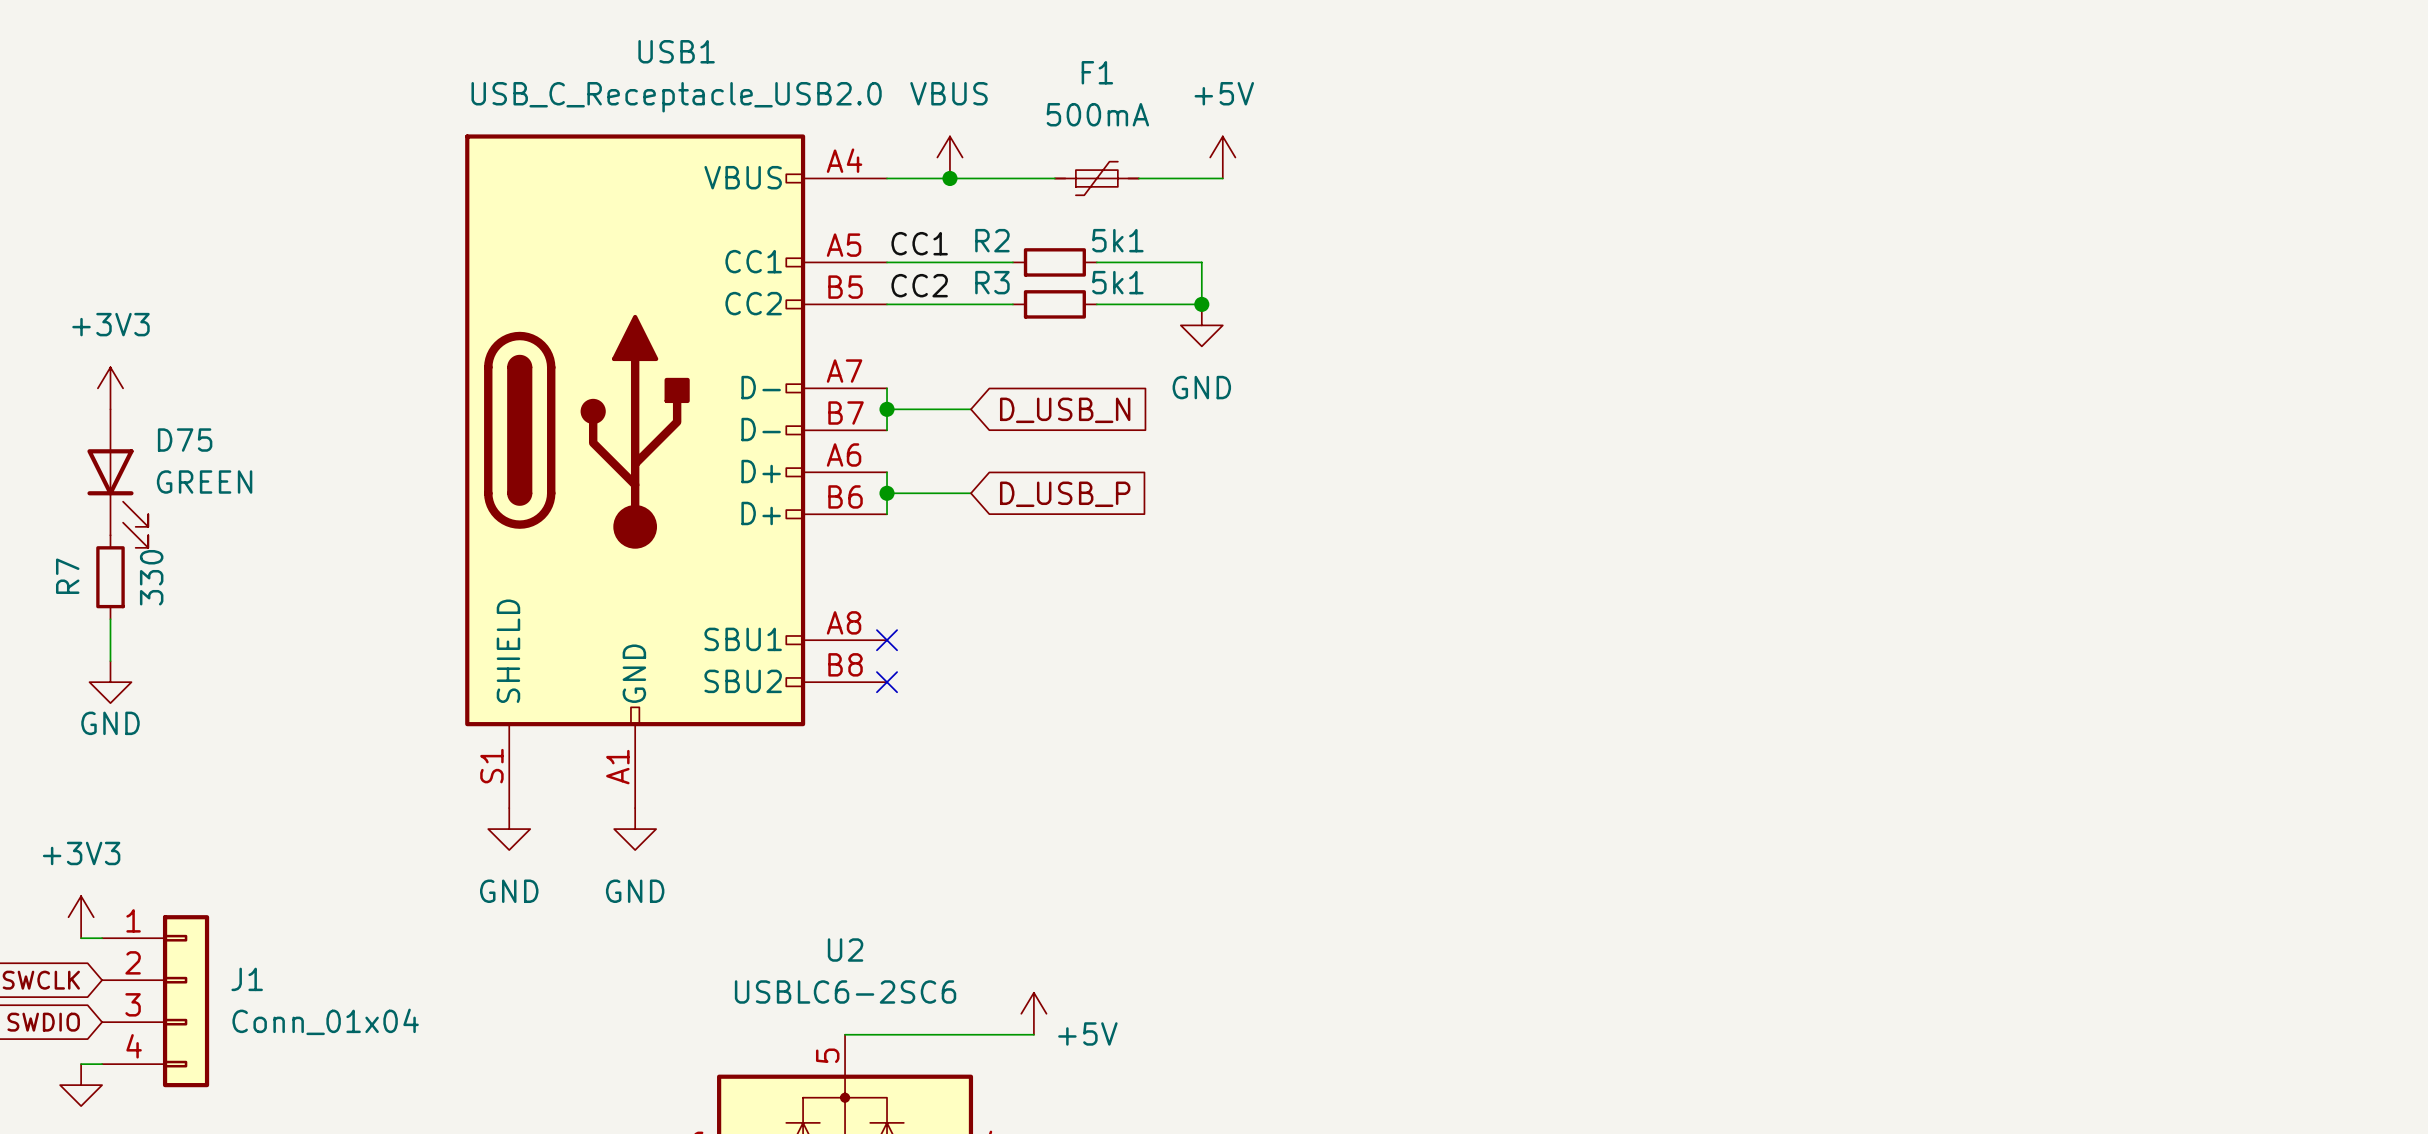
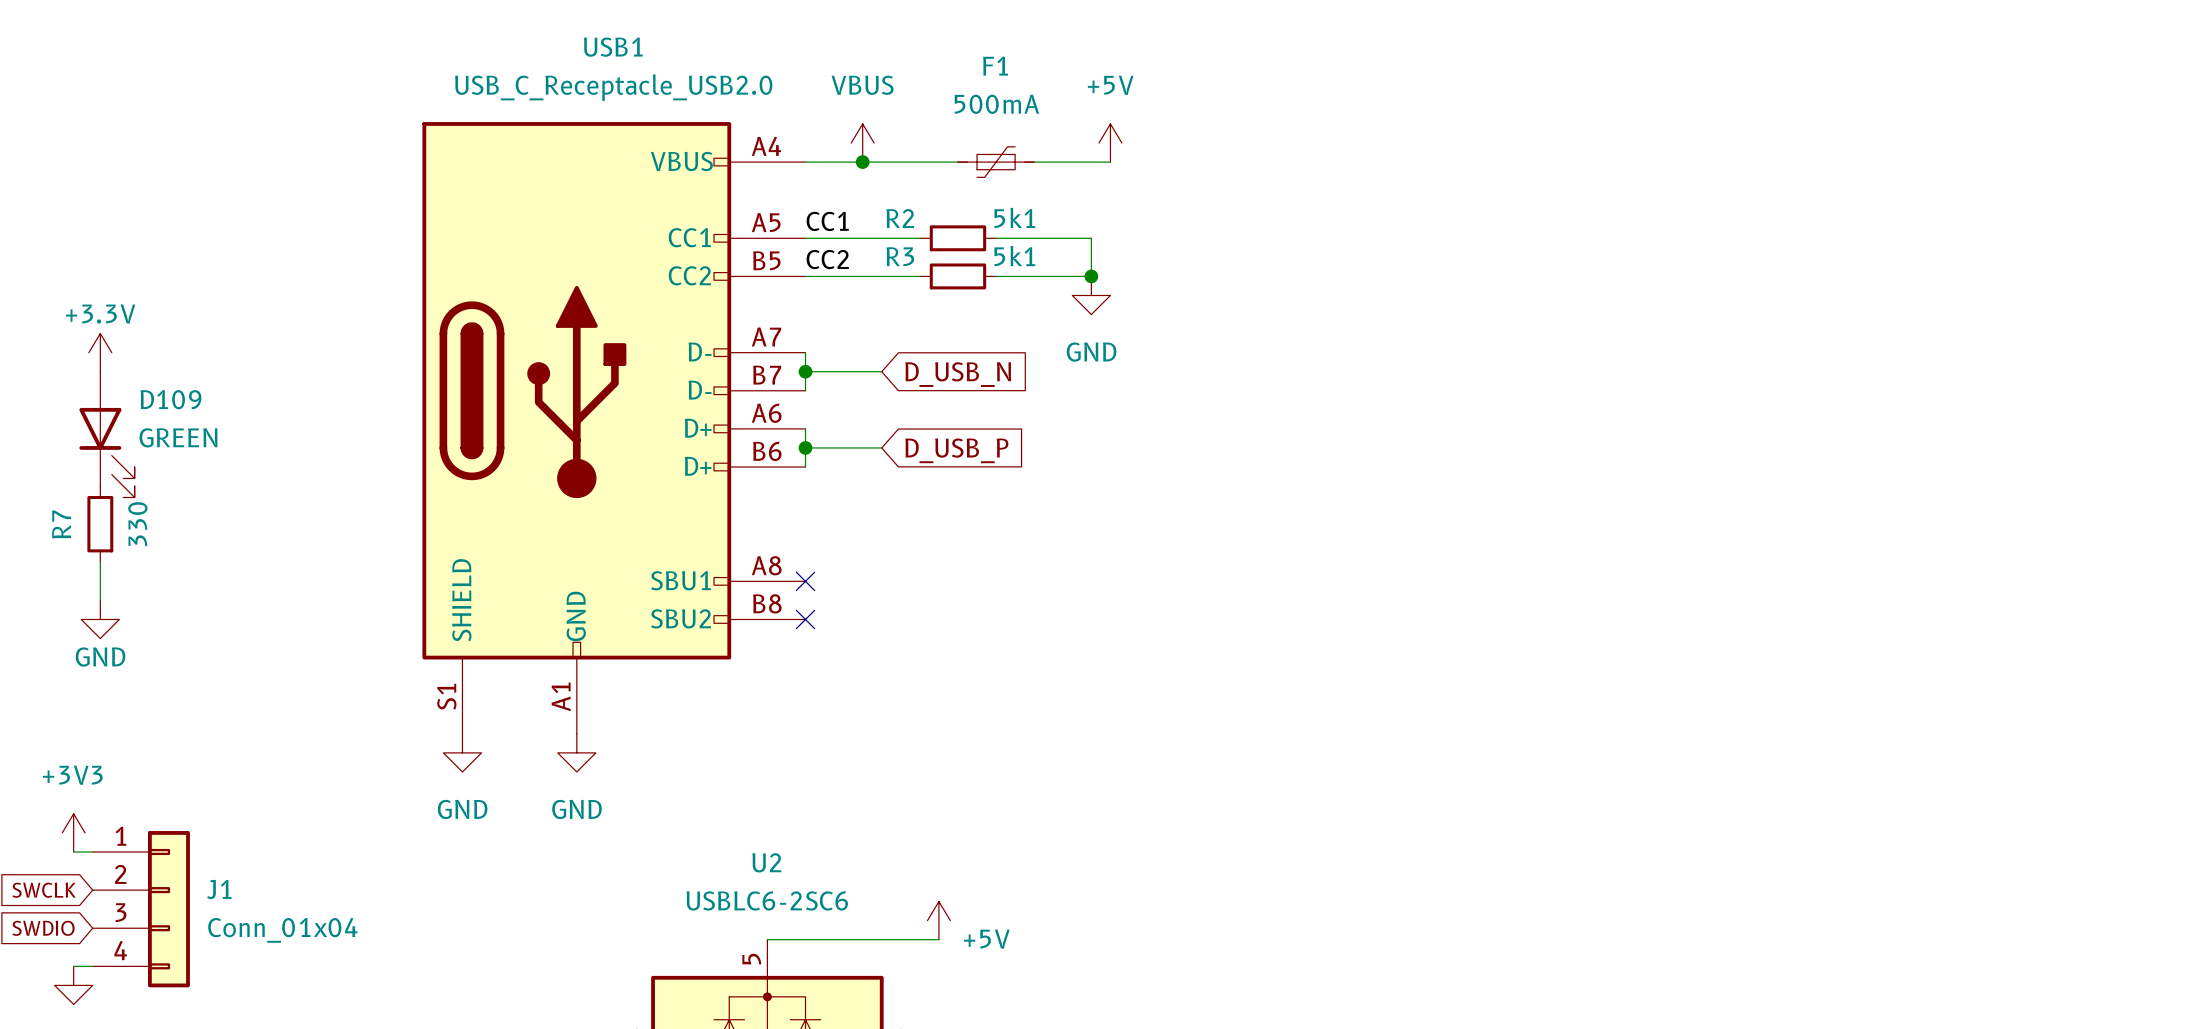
power symbol: +3V3 (110, 388) -> +3.3V (100, 352)
D75 name: D75 (185, 440) -> D109 (171, 399)

